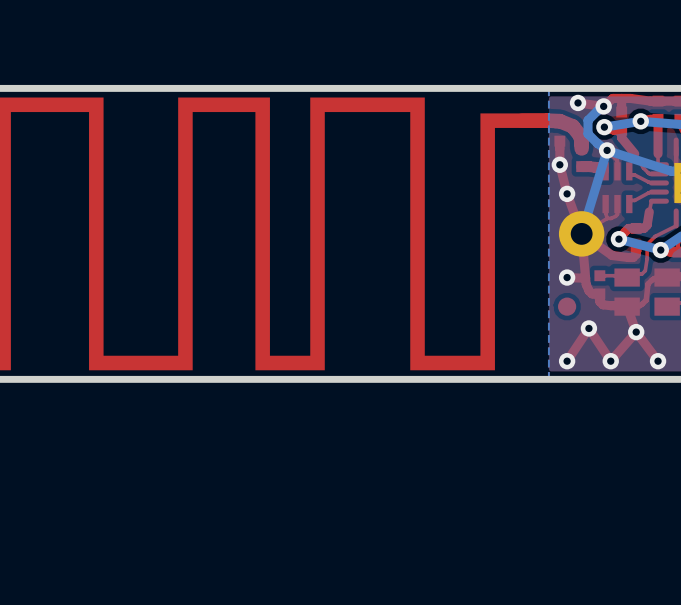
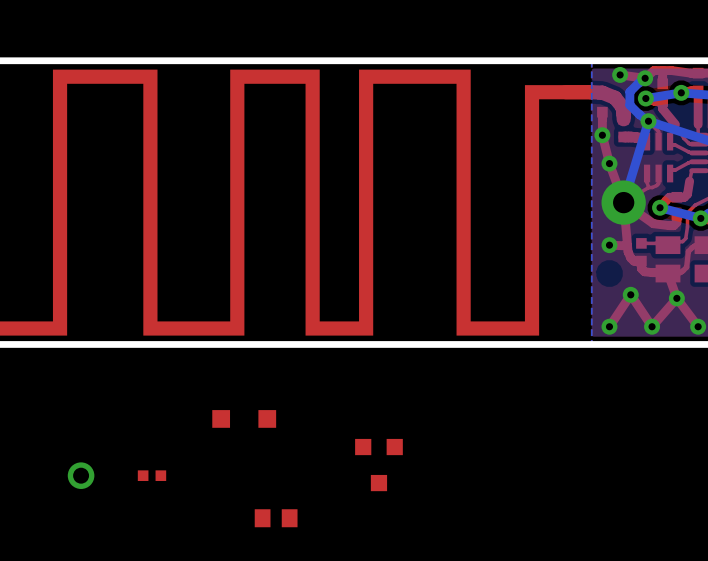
part: (567, 306) -> none
part: none -> (244, 418)
part: none -> (378, 465)
part: none -> (81, 475)
part: none -> (152, 475)
part: none -> (276, 518)

